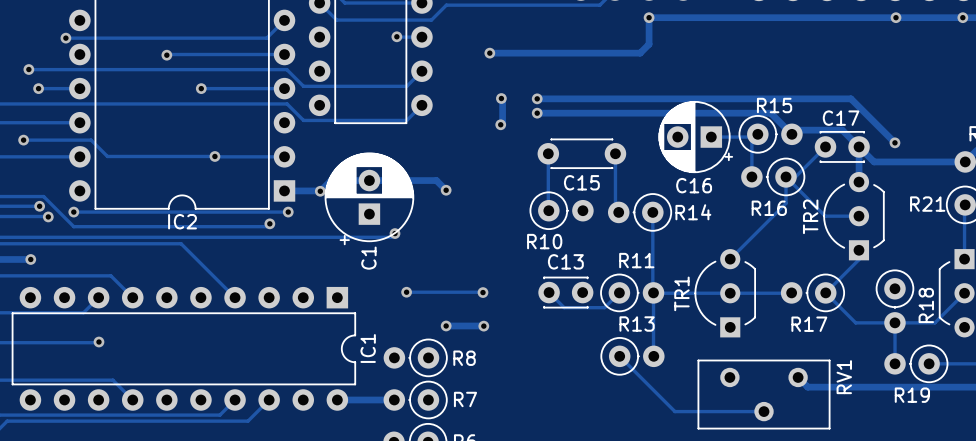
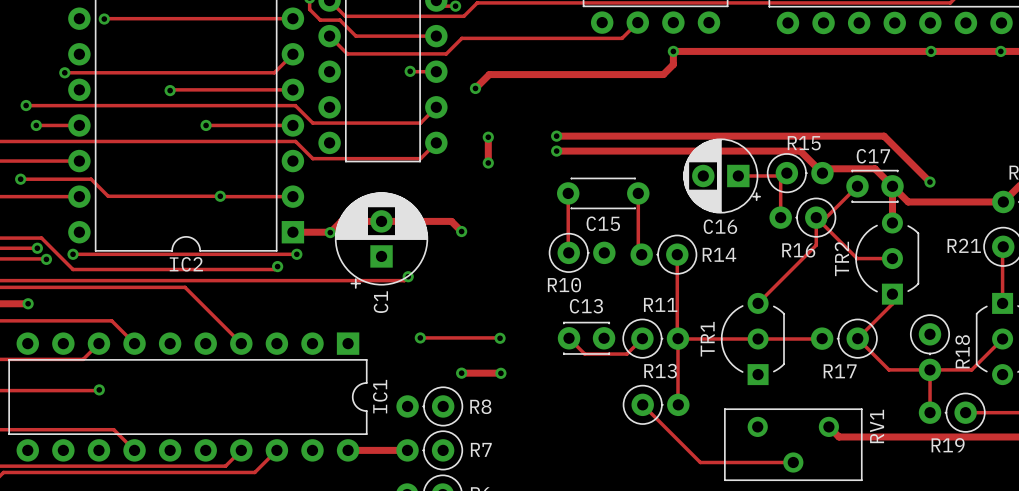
track: (649, 30) (649, 44) (640, 53) (489, 53) -> (673, 64) (663, 74) (489, 74) (475, 88)
via: none -> (475, 88)
via: (489, 53) -> none
via: (501, 98) -> none
track: none -> (488, 137) (488, 162)
via: none -> (488, 137)
track: (502, 99) (502, 122) (500, 124) -> none
via: none -> (488, 162)
via: (500, 124) -> none

